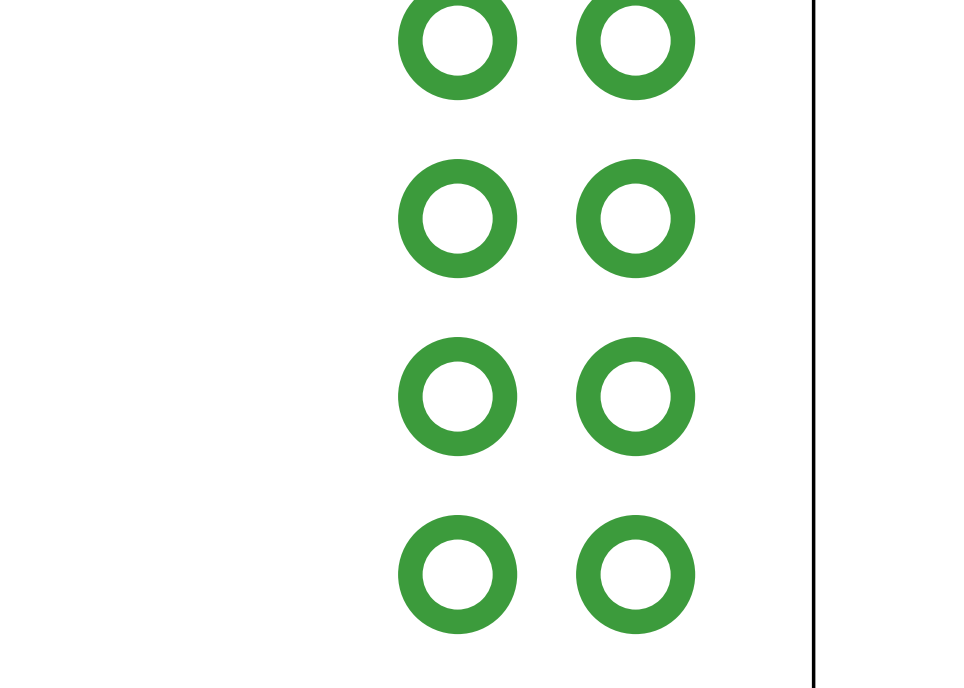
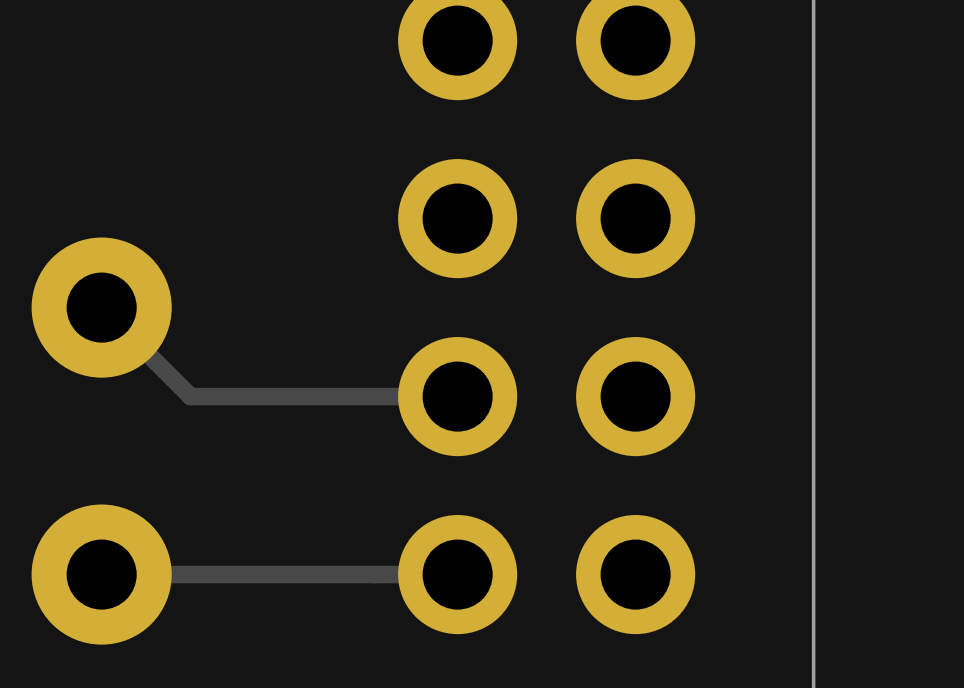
track: none -> (101, 307) (190, 396) (457, 396)
part: none -> (101, 307)
part: none -> (101, 574)
track: none -> (457, 574) (101, 574)

